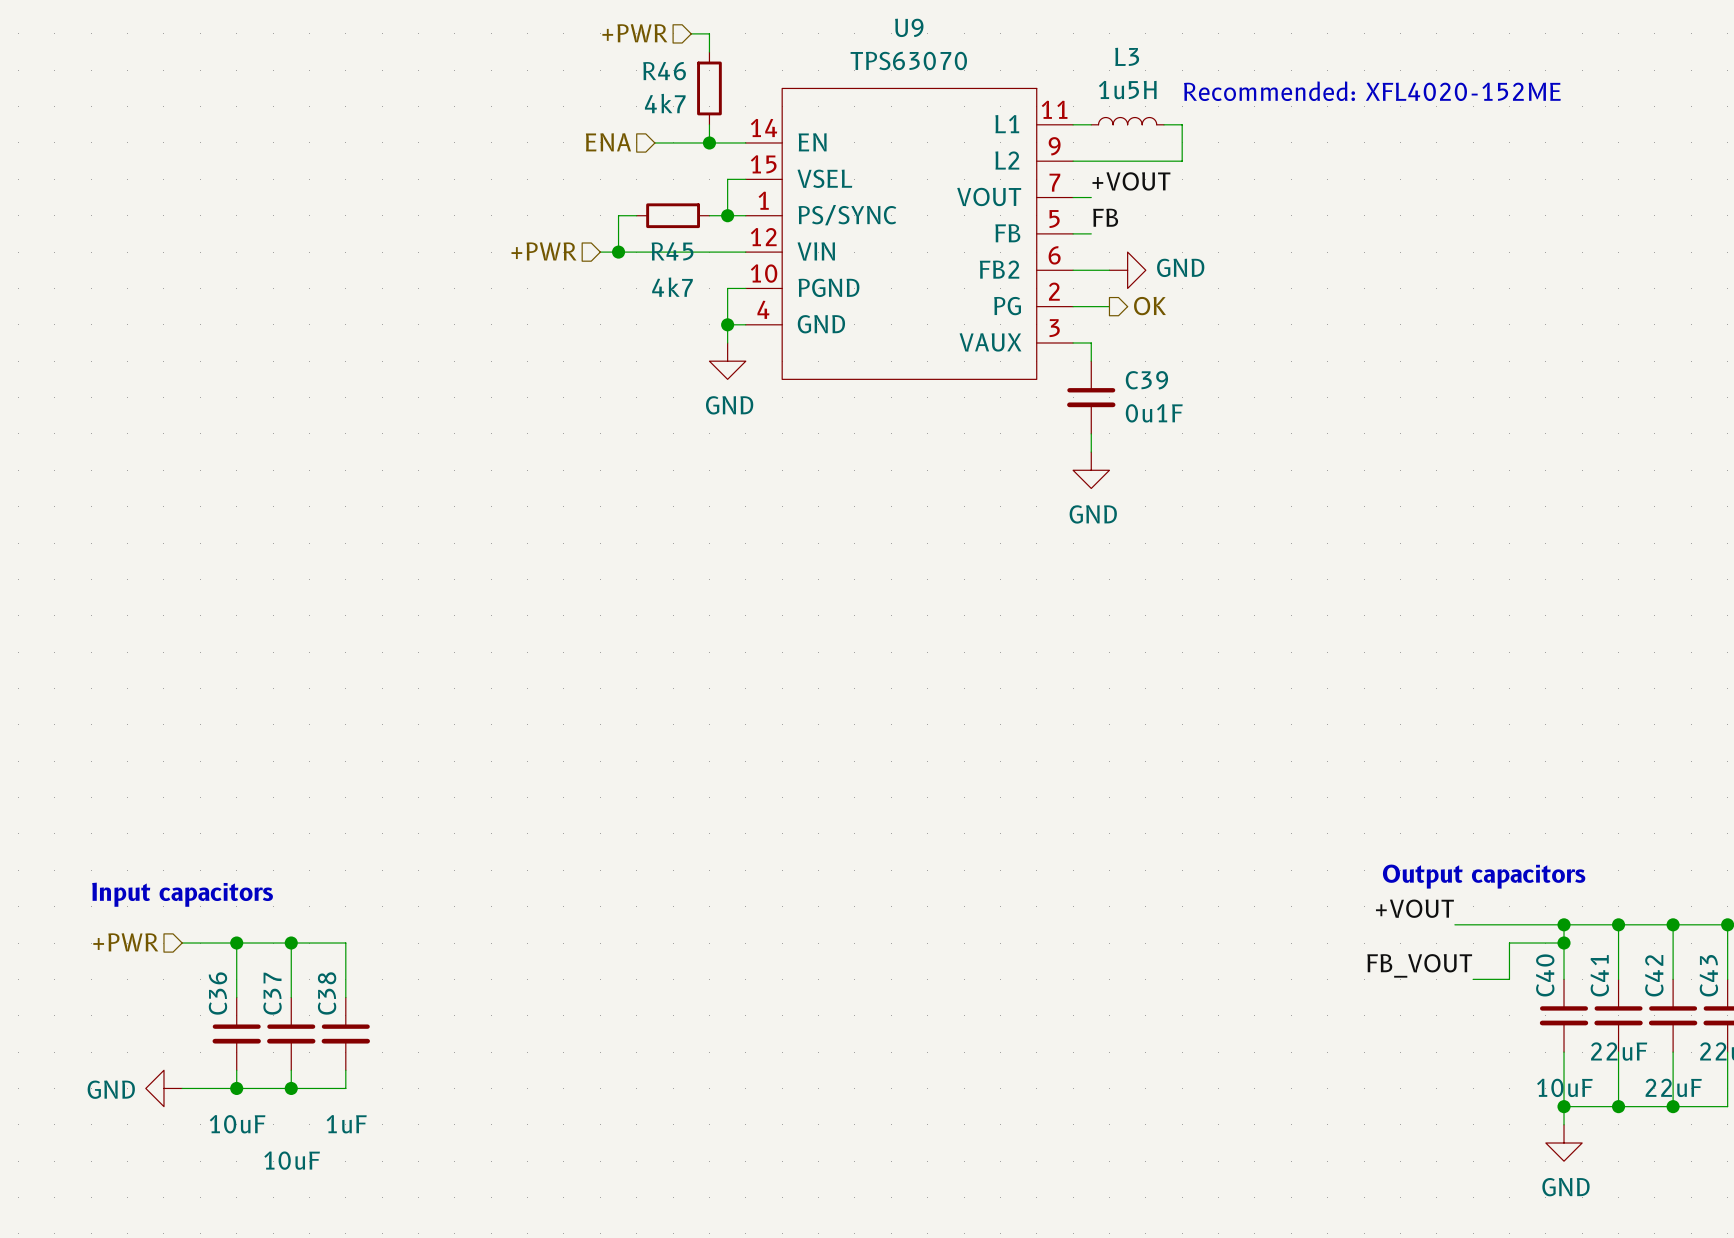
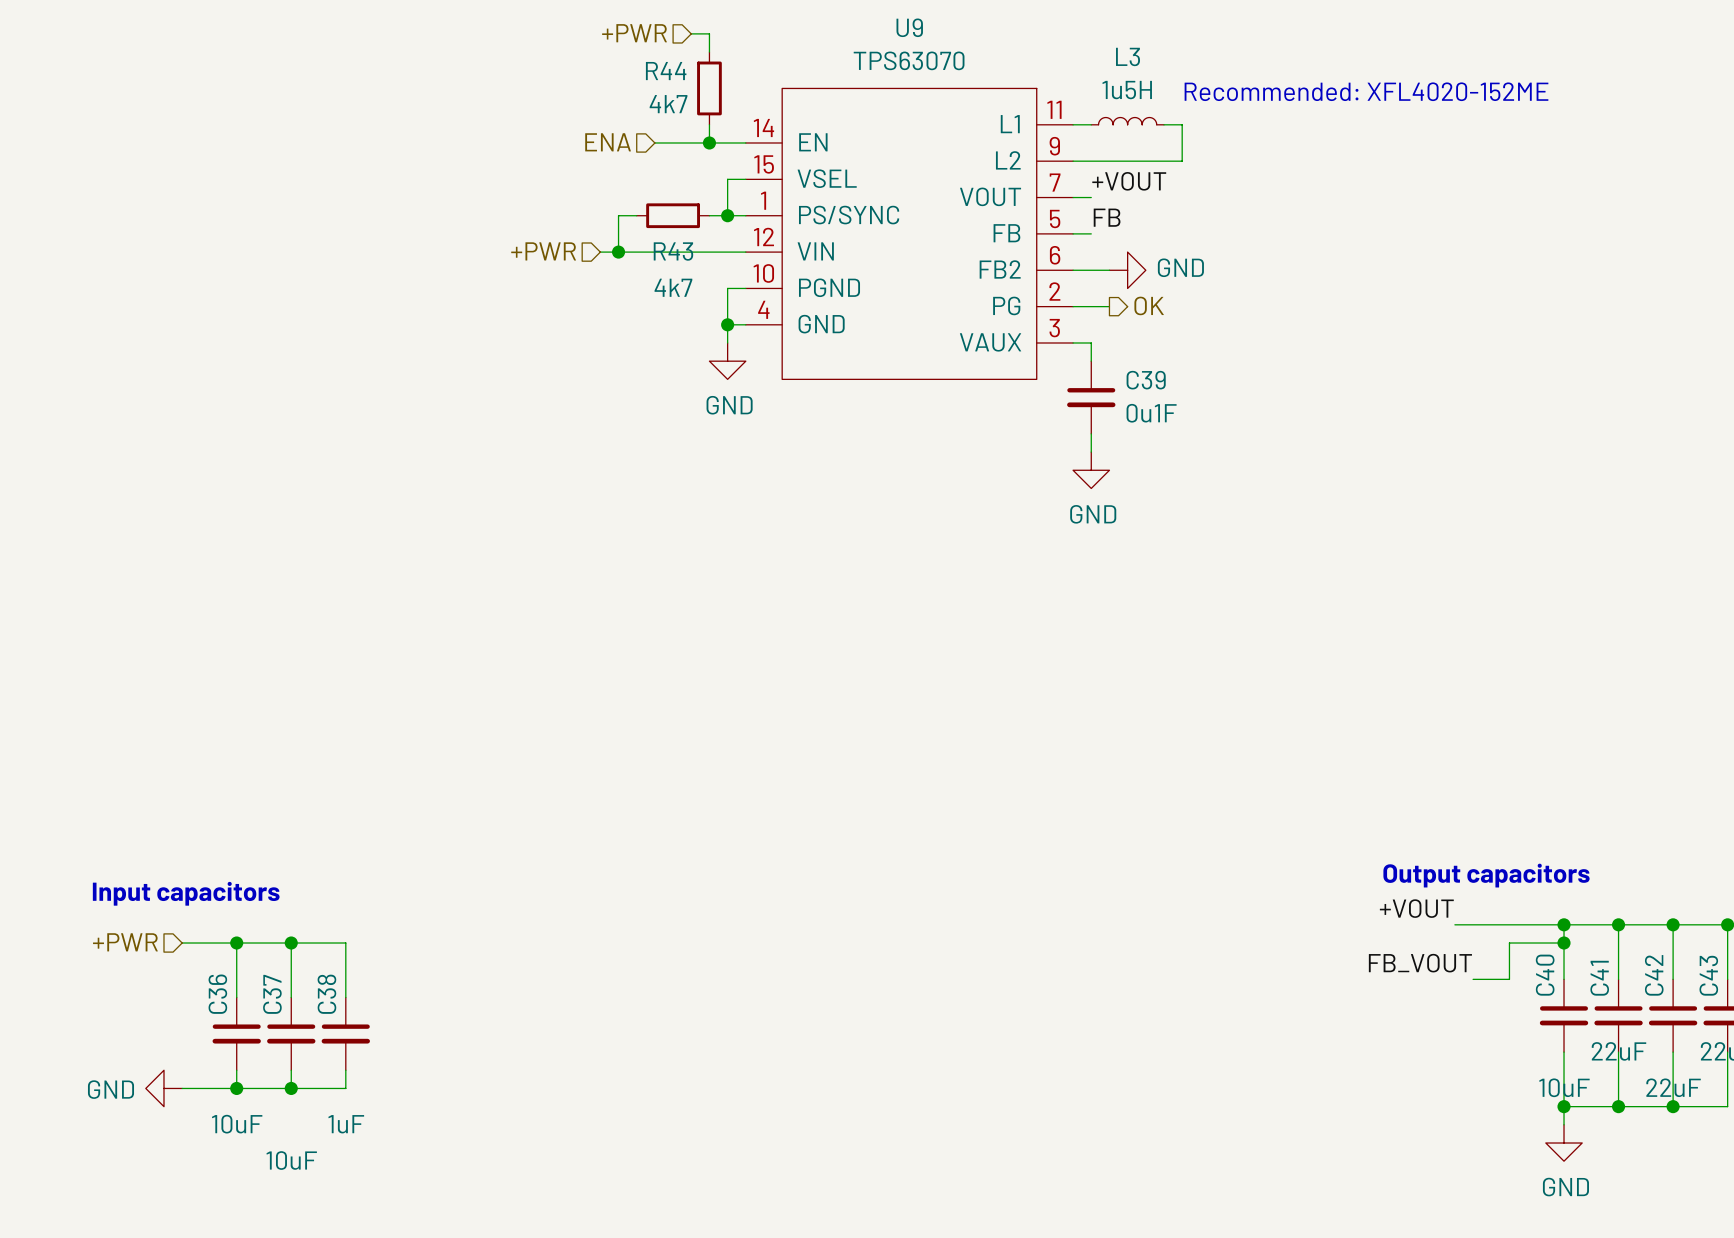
R46 name: R46 (664, 71) -> R44 (666, 71)
R45 name: R45 (672, 251) -> R43 (673, 251)

